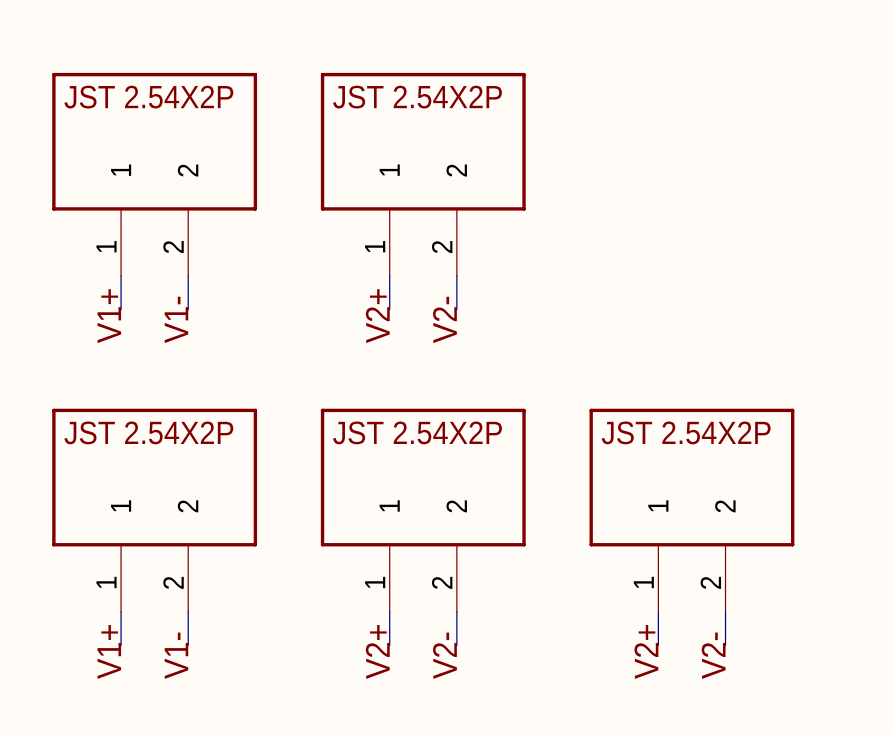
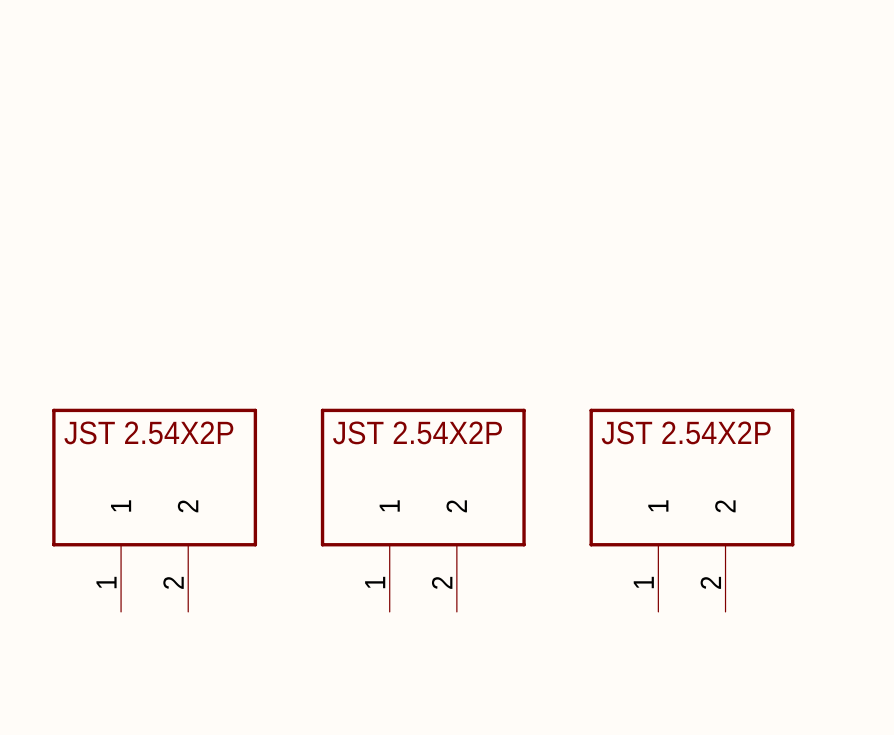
part: (154, 174) -> none
part: (423, 174) -> none
wire: (121, 276) (121, 309) -> none
wire: (188, 276) (188, 309) -> none
wire: (389, 276) (389, 309) -> none
wire: (456, 276) (456, 309) -> none
label: V1+ (109, 316) -> none
label: V2+ (377, 316) -> none
label: V1- (176, 319) -> none
label: V2- (444, 319) -> none
wire: (121, 611) (121, 645) -> none
wire: (188, 611) (188, 645) -> none
wire: (389, 611) (389, 645) -> none
wire: (456, 611) (456, 645) -> none
wire: (658, 611) (658, 645) -> none
wire: (725, 611) (725, 645) -> none
label: V1+ (109, 651) -> none
label: V2+ (377, 651) -> none
label: V2+ (646, 651) -> none
label: V1- (176, 655) -> none
label: V2- (444, 655) -> none
label: V2- (713, 655) -> none

